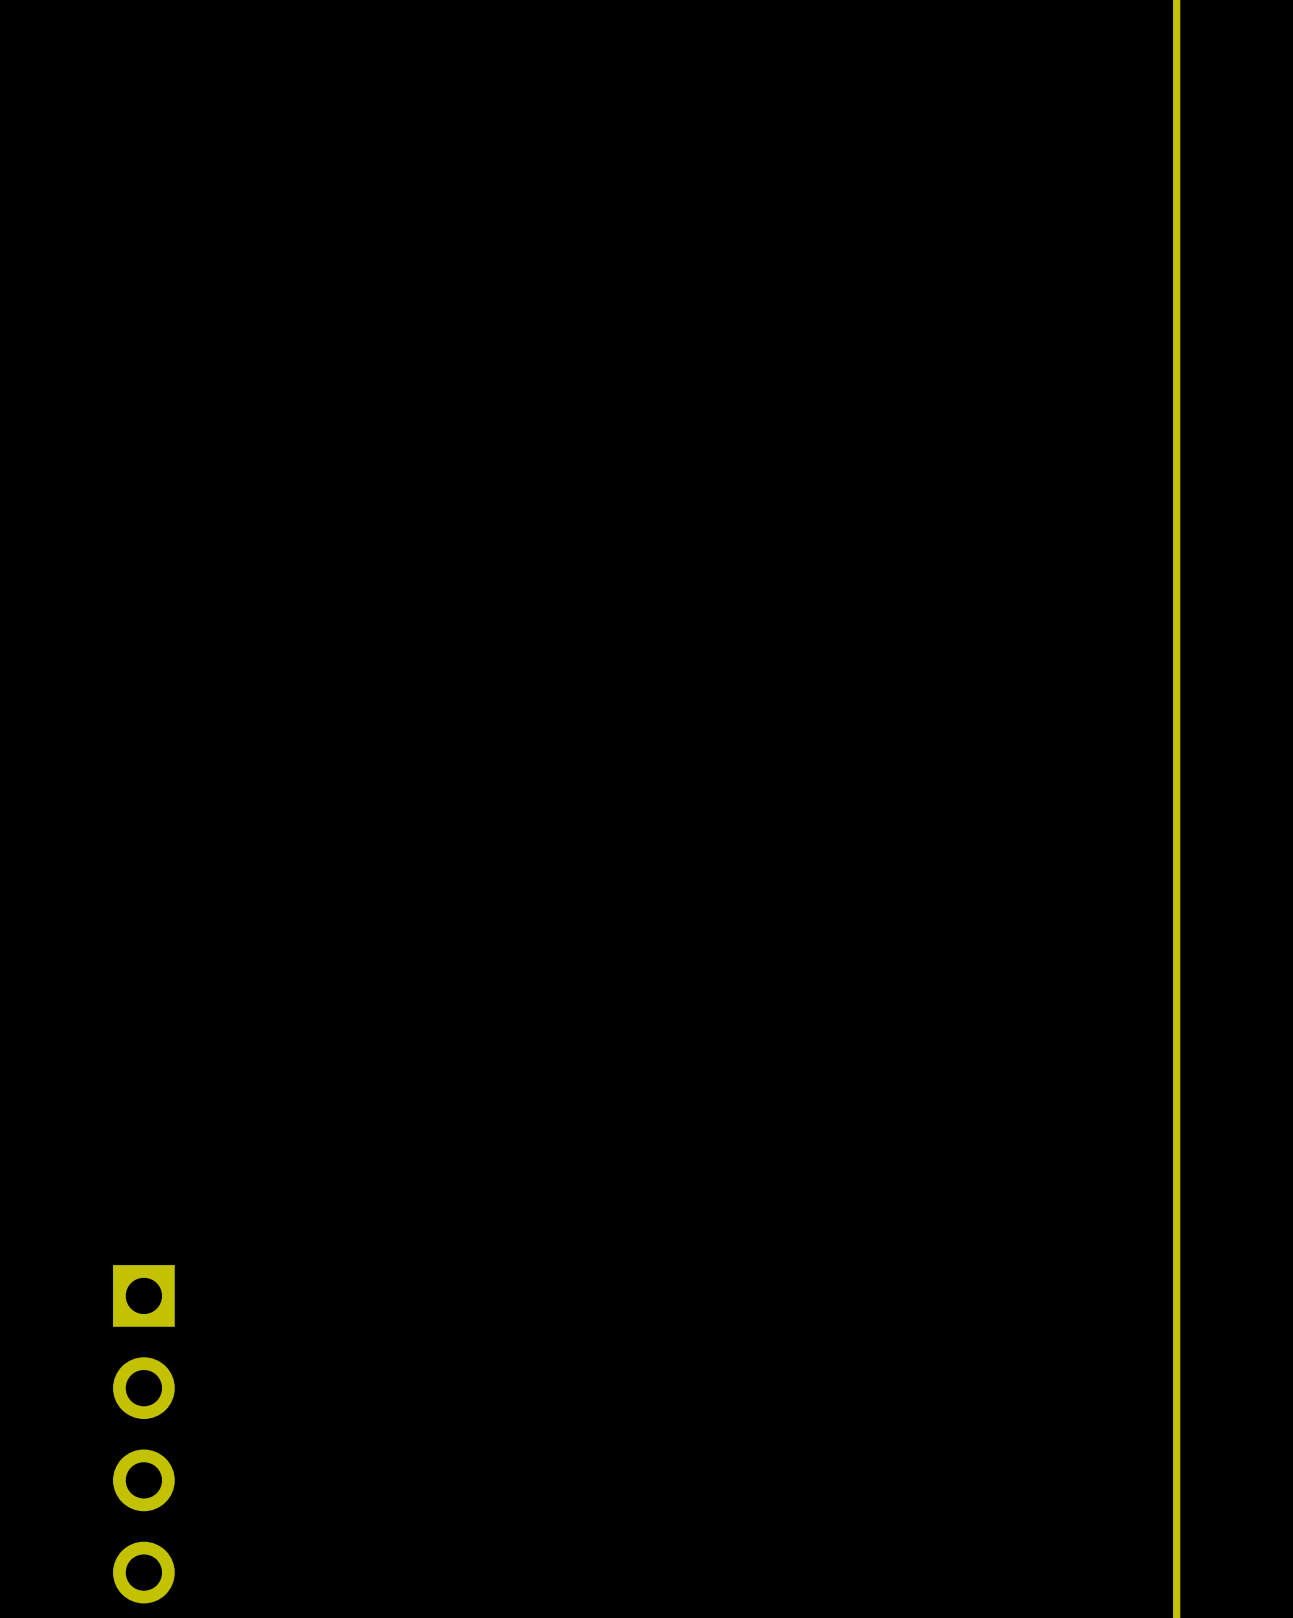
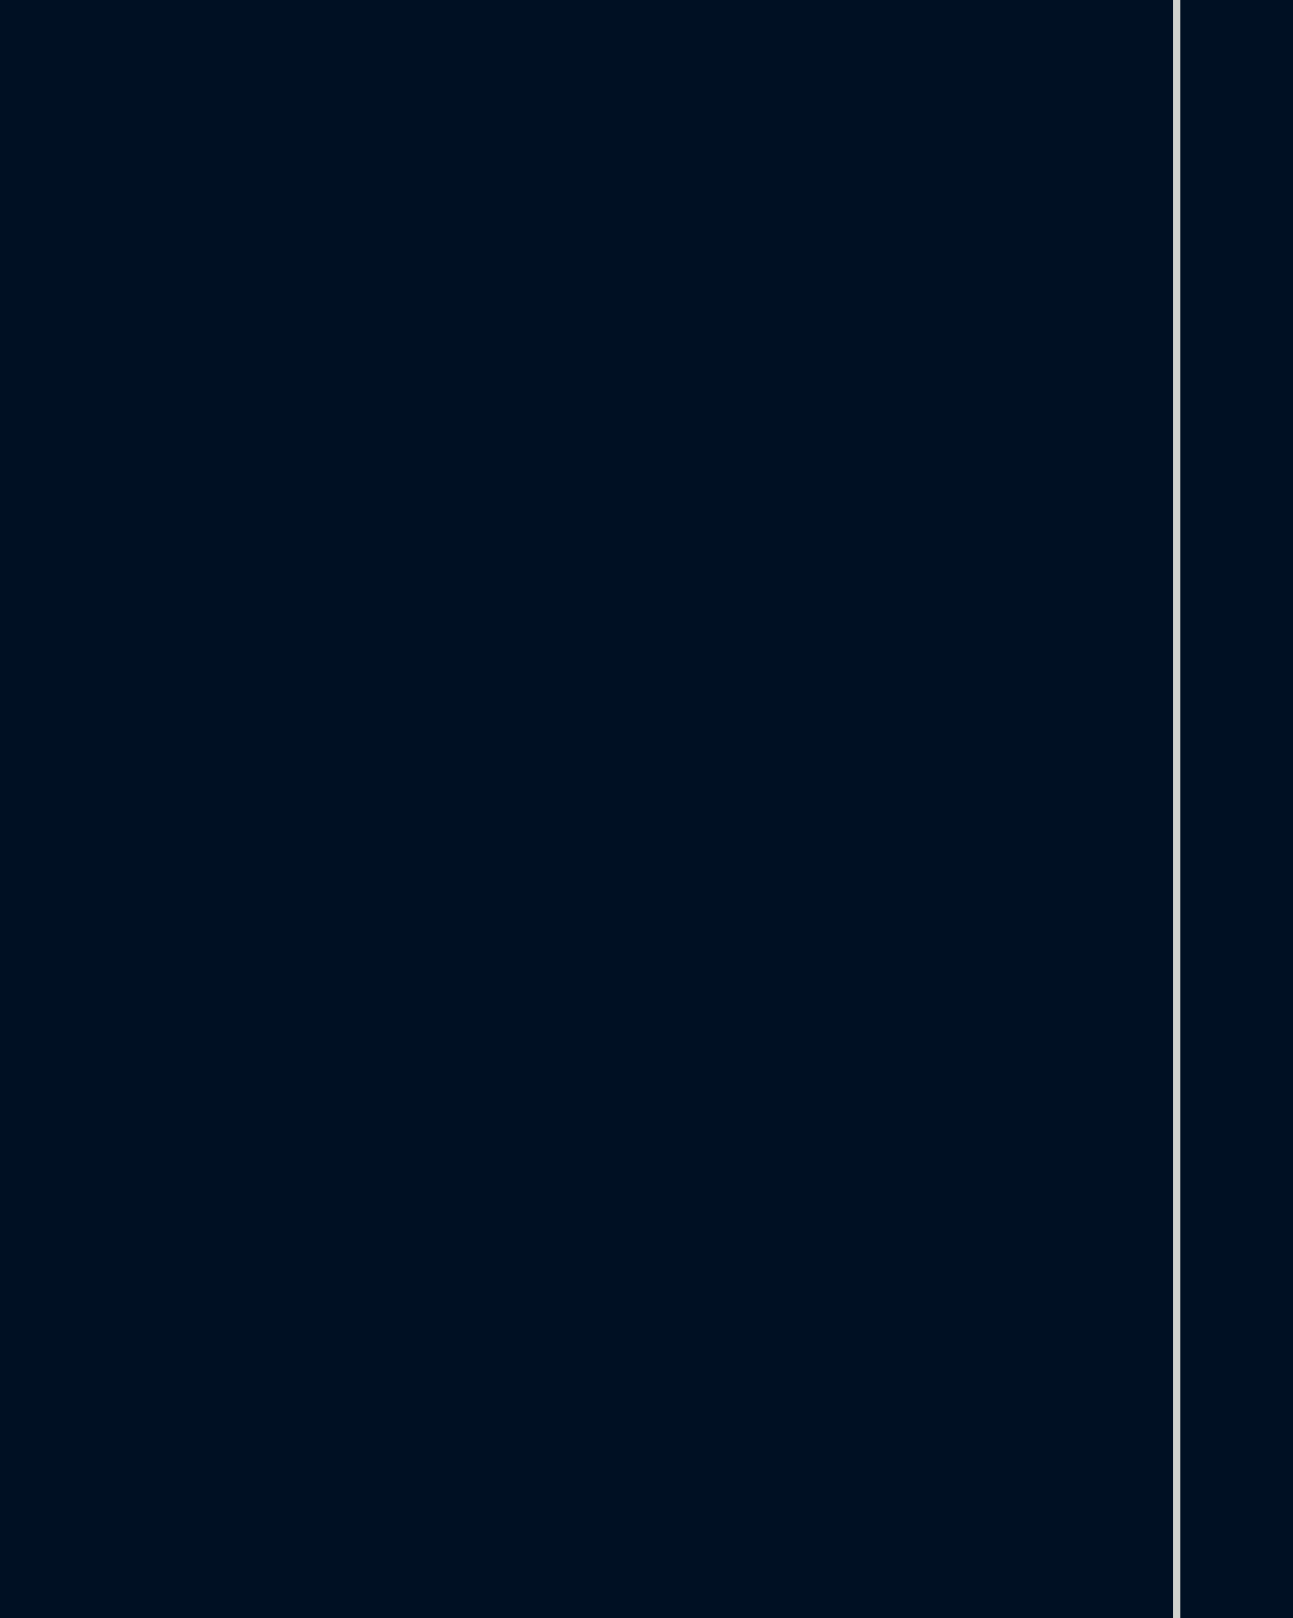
part: (143, 1434) -> none

